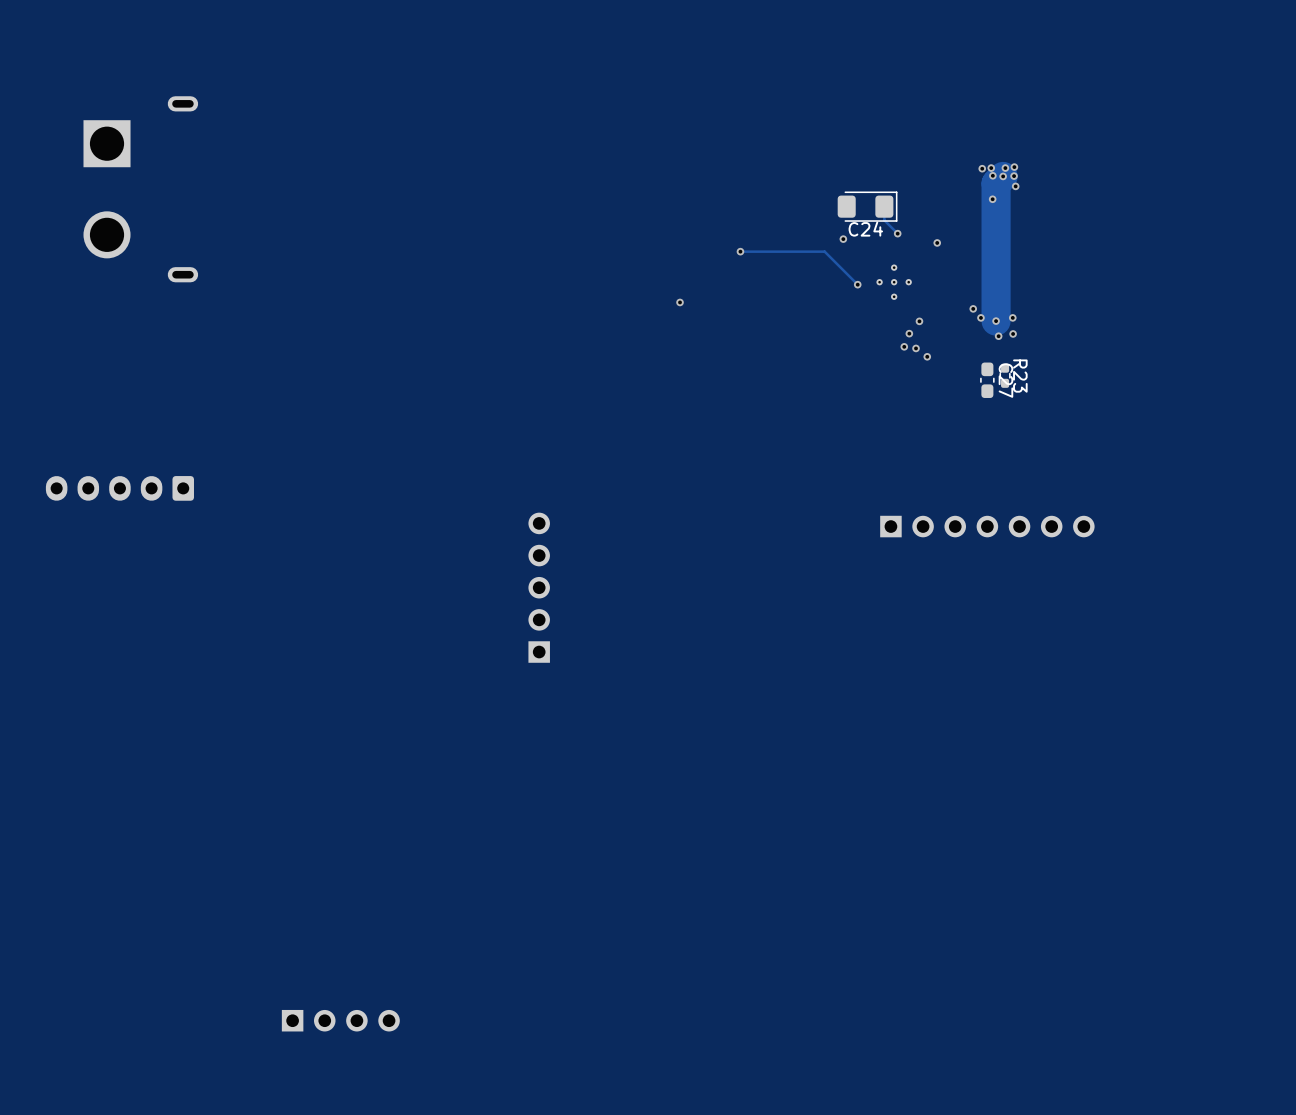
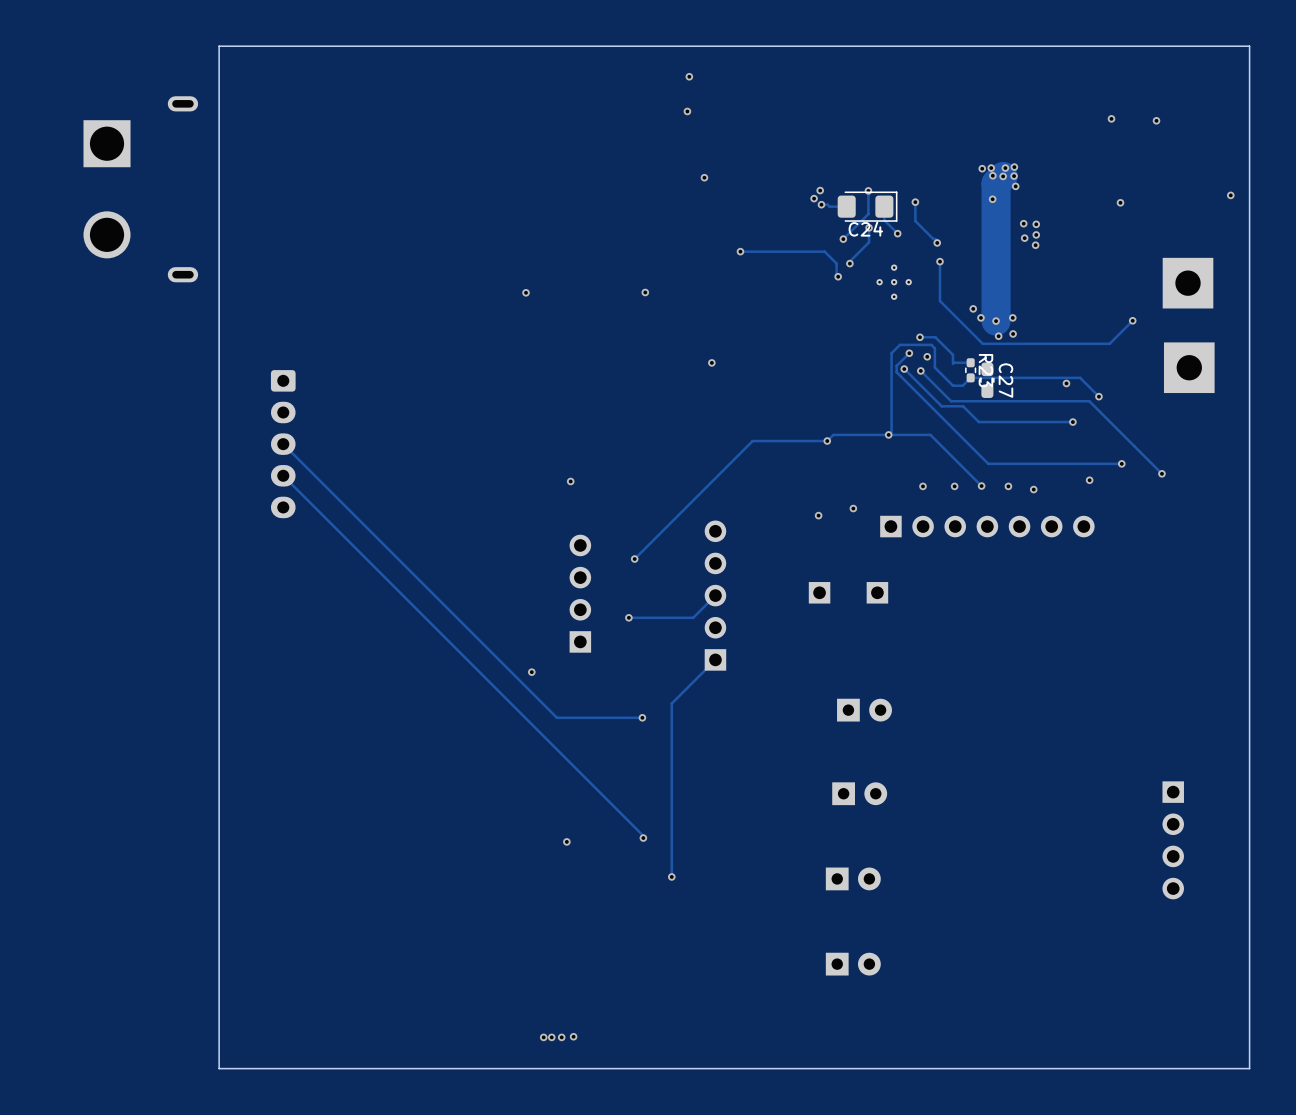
board edge: none -> (1249, 46) (219, 46) (219, 1068) (1249, 1068) (1249, 46)
via: none -> (689, 76)
via: none -> (687, 111)
via: none -> (1111, 118)
via: none -> (1156, 120)
via: none -> (704, 177)
via: none -> (820, 190)
track: none -> (868, 190) (868, 214) (843, 239)
via: none -> (868, 190)
via: none -> (1230, 195)
via: none -> (814, 198)
track: none -> (915, 202) (915, 221) (933, 238) (935, 238)
via: none -> (915, 202)
via: none -> (1120, 202)
track: none -> (821, 204) (846, 206)
via: none -> (821, 204)
via: none -> (1023, 223)
via: none -> (1036, 224)
track: none -> (869, 227) (869, 242) (849, 263)
via: none -> (869, 227)
via: none -> (1036, 234)
via: none -> (1024, 238)
via: none -> (1035, 245)
track: none -> (940, 261) (940, 301) (982, 343) (1109, 343) (1132, 320)
via: none -> (940, 261)
track: (836, 263) (857, 284) -> (836, 263) (838, 276)
via: none -> (849, 263)
via: none -> (838, 276)
part: none -> (1188, 283)
via: (857, 284) -> none
via: none -> (526, 292)
via: none -> (645, 292)
via: (680, 302) -> none
via: none -> (1132, 320)
via: (919, 321) -> none
via: (909, 333) -> none
track: none -> (919, 337) (935, 337) (952, 354) (952, 363) (970, 362)
via: none -> (919, 337)
via: (904, 346) -> none
via: (916, 348) -> none
track: none -> (909, 353) (896, 365) (896, 372) (988, 463) (1121, 463)
via: none -> (909, 353)
via: none -> (711, 362)
part: none -> (1189, 367)
track: none -> (904, 369) (941, 406) (963, 406) (978, 422) (1072, 422)
via: none -> (904, 369)
track: none -> (920, 370) (951, 401) (1089, 401) (1161, 473)
via: none -> (920, 370)
R23 position: (1005, 375) -> (970, 370)
via: none -> (1066, 383)
track: none -> (1098, 396) (1080, 377) (970, 377) (962, 385) (952, 385) (934, 367) (934, 348) (931, 344) (899, 344) (891, 353) (891, 432) (888, 434)
via: none -> (1098, 396)
via: none -> (1072, 422)
via: none -> (888, 434)
via: none -> (827, 441)
track: none -> (283, 444) (556, 717) (642, 717)
via: none -> (1121, 463)
via: none -> (1161, 473)
track: none -> (283, 475) (643, 835) (643, 838)
via: none -> (1089, 480)
via: none -> (570, 481)
via: none -> (922, 486)
via: none -> (954, 486)
track: none -> (981, 486) (930, 434) (833, 434) (827, 441) (752, 441) (634, 559)
via: none -> (981, 486)
via: none -> (1008, 486)
part rotation: 0° (119, 488) -> 90° counterclockwise (283, 444)
part position: (119, 488) -> (283, 444)
via: none -> (1033, 489)
via: none -> (853, 508)
via: none -> (818, 515)
via: none -> (634, 559)
part position: (539, 587) -> (715, 595)
part: none -> (819, 592)
part: none -> (877, 592)
part: none -> (580, 593)
track: none -> (715, 595) (693, 617) (628, 617)
via: none -> (628, 617)
track: none -> (715, 659) (671, 703) (671, 876)
via: none -> (531, 672)
part: none -> (864, 710)
via: none -> (642, 717)
part: none -> (859, 793)
via: none -> (643, 838)
part: none -> (1173, 840)
via: none -> (566, 841)
via: none -> (671, 876)
part: none -> (853, 878)
part: none -> (853, 964)
part: (340, 1020) -> none
via: none -> (573, 1036)
via: none -> (543, 1037)
via: none -> (551, 1037)
via: none -> (561, 1037)

